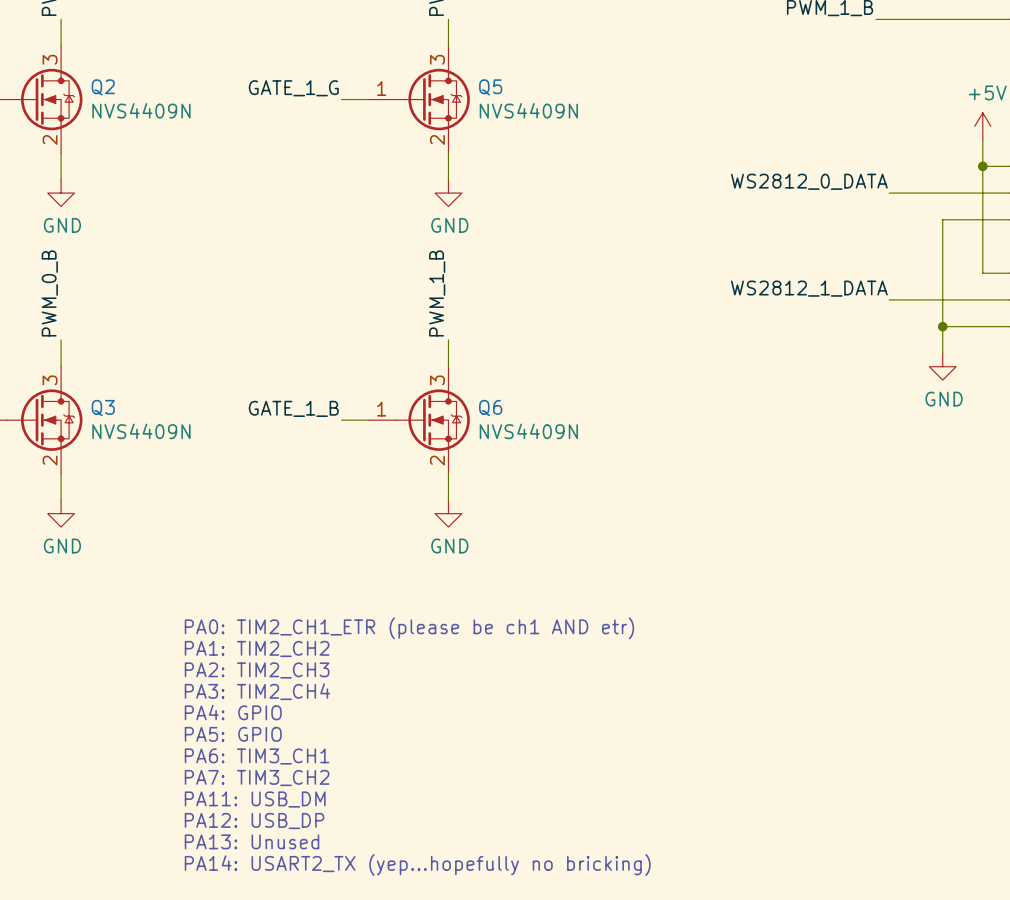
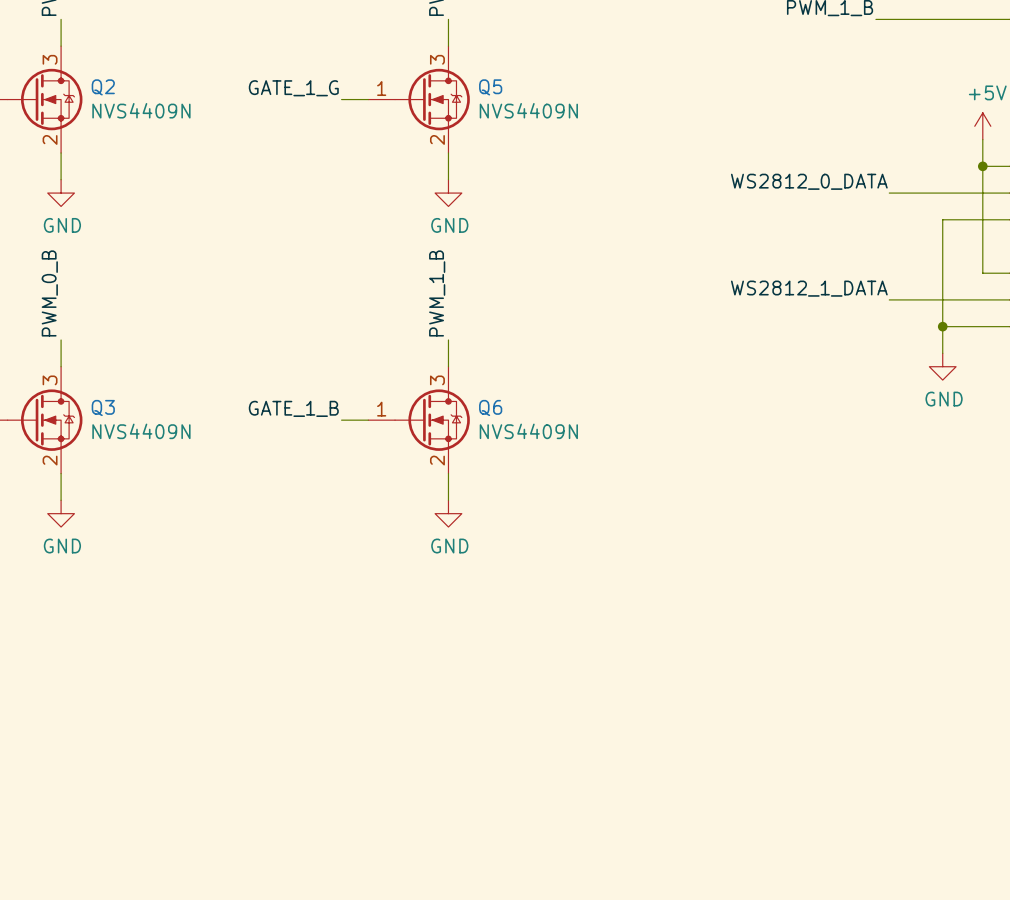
text: PA0: TIM2_CH1_ETR (please be ch1 AND etr) (409, 628) -> none
text: PA1: TIM2_CH2 (257, 648) -> none
text: PA2: TIM2_CH3 (257, 670) -> none
text: PA3: TIM2_CH4 (257, 691) -> none
text: PA4: GPIO (233, 712) -> none
text: PA5: GPIO (233, 734) -> none
text: PA6: TIM3_CH1 (257, 756) -> none
text: PA7: TIM3_CH2 (257, 778) -> none
text: PA11: USB_DM (255, 799) -> none
text: PA12: USB_DP (254, 821) -> none
text: PA13: Unused (252, 841) -> none
text: PA14: USART2_TX (yep...hopefully no bricking) (417, 864) -> none

